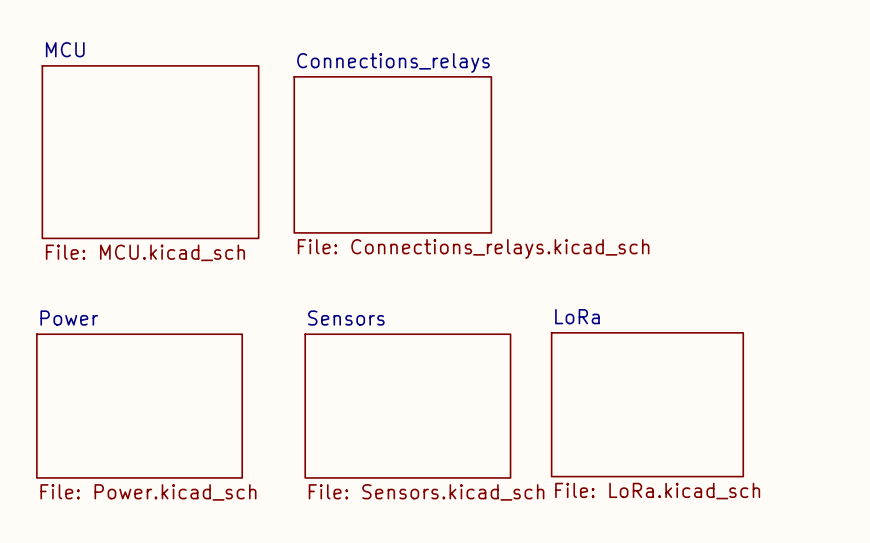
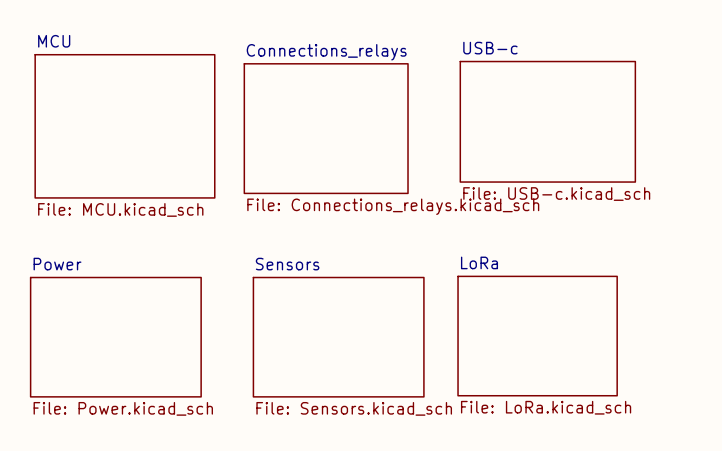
sheet USB-c: none -> File: USB-c.kicad_sch (547, 121)

